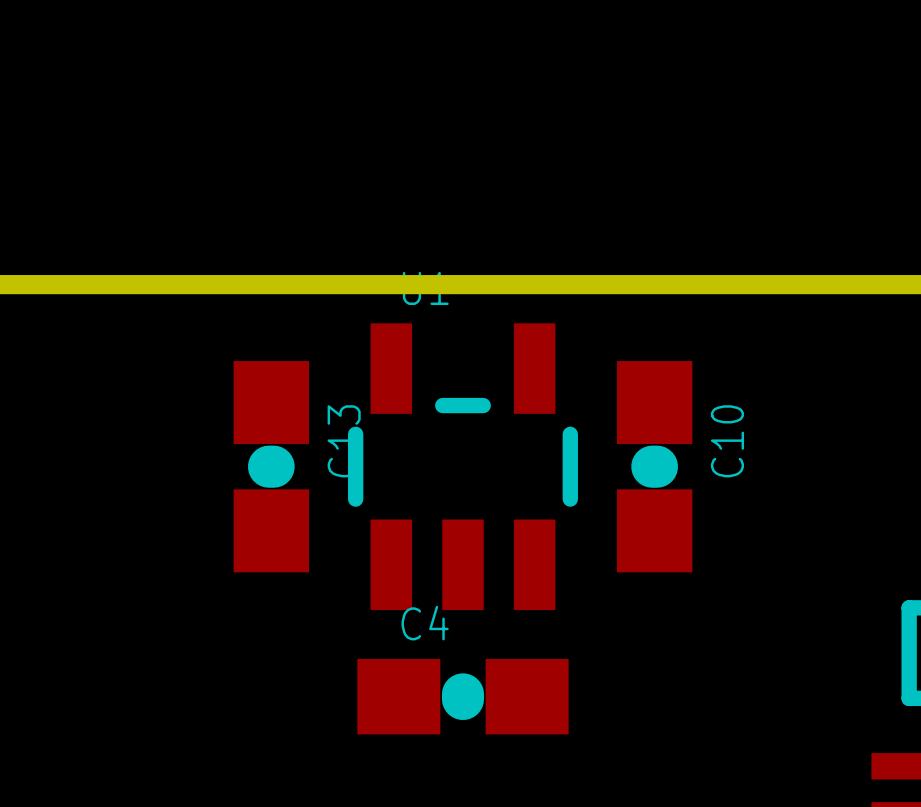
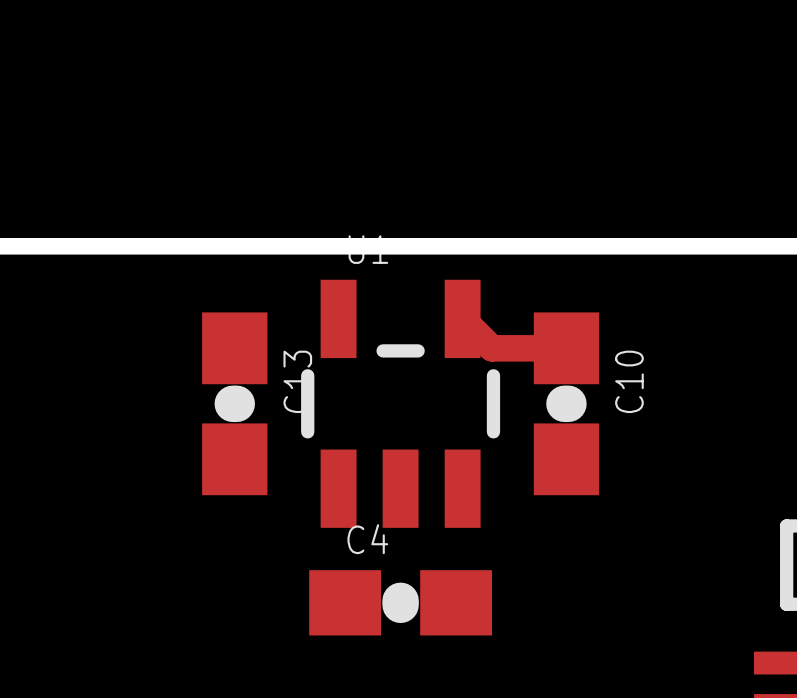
track: none -> (462, 318) (492, 348) (566, 348)

